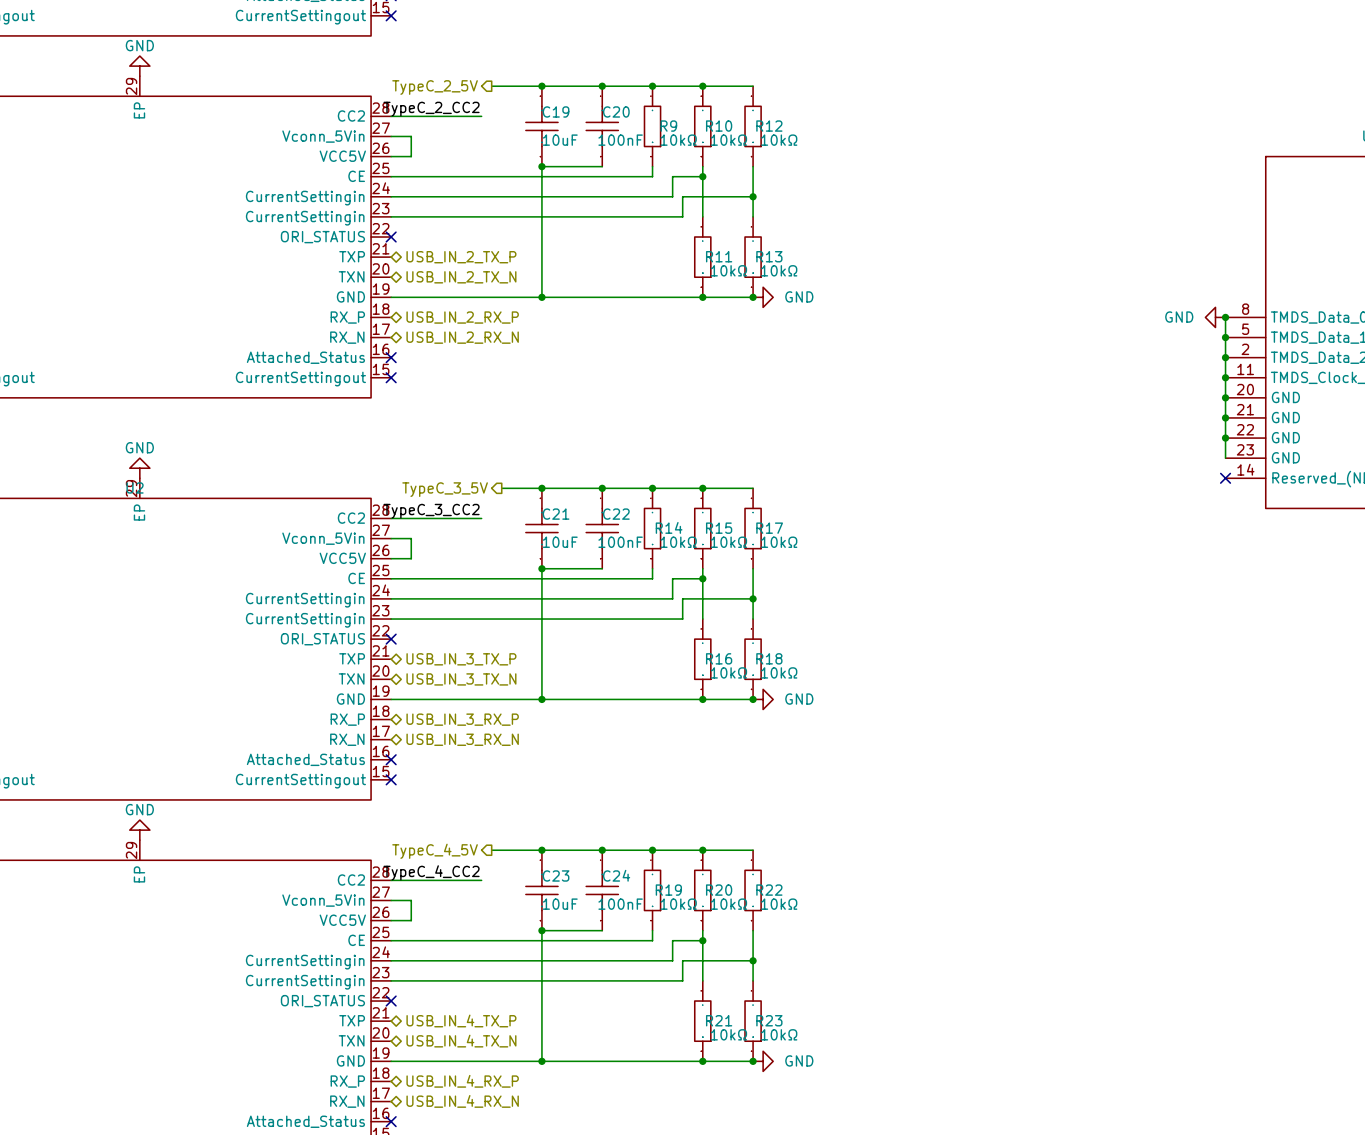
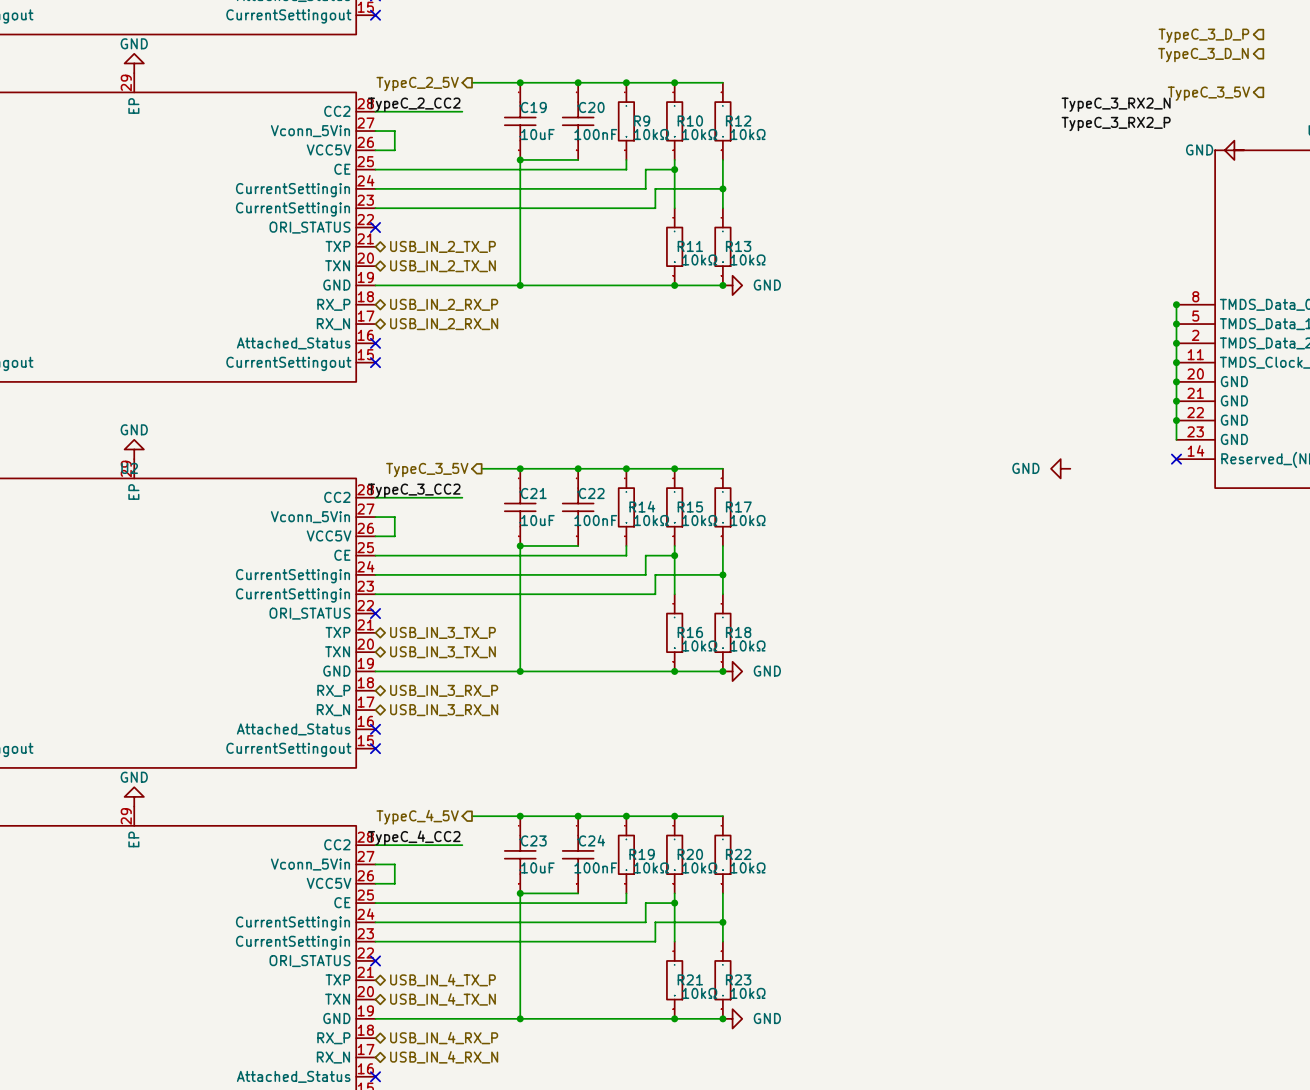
hierarchical label: none -> TypeC_3_D_P (1203, 35)
hierarchical label: none -> TypeC_3_D_N (1203, 55)
hierarchical label: none -> TypeC_3_5V (1208, 93)
label: none -> TypeC_3_RX2_N (1116, 104)
label: none -> TypeC_3_RX2_P (1116, 124)
power symbol: none -> GND (1234, 150)
power symbol: GND (1215, 317) -> none
power symbol: none -> GND (1060, 468)

